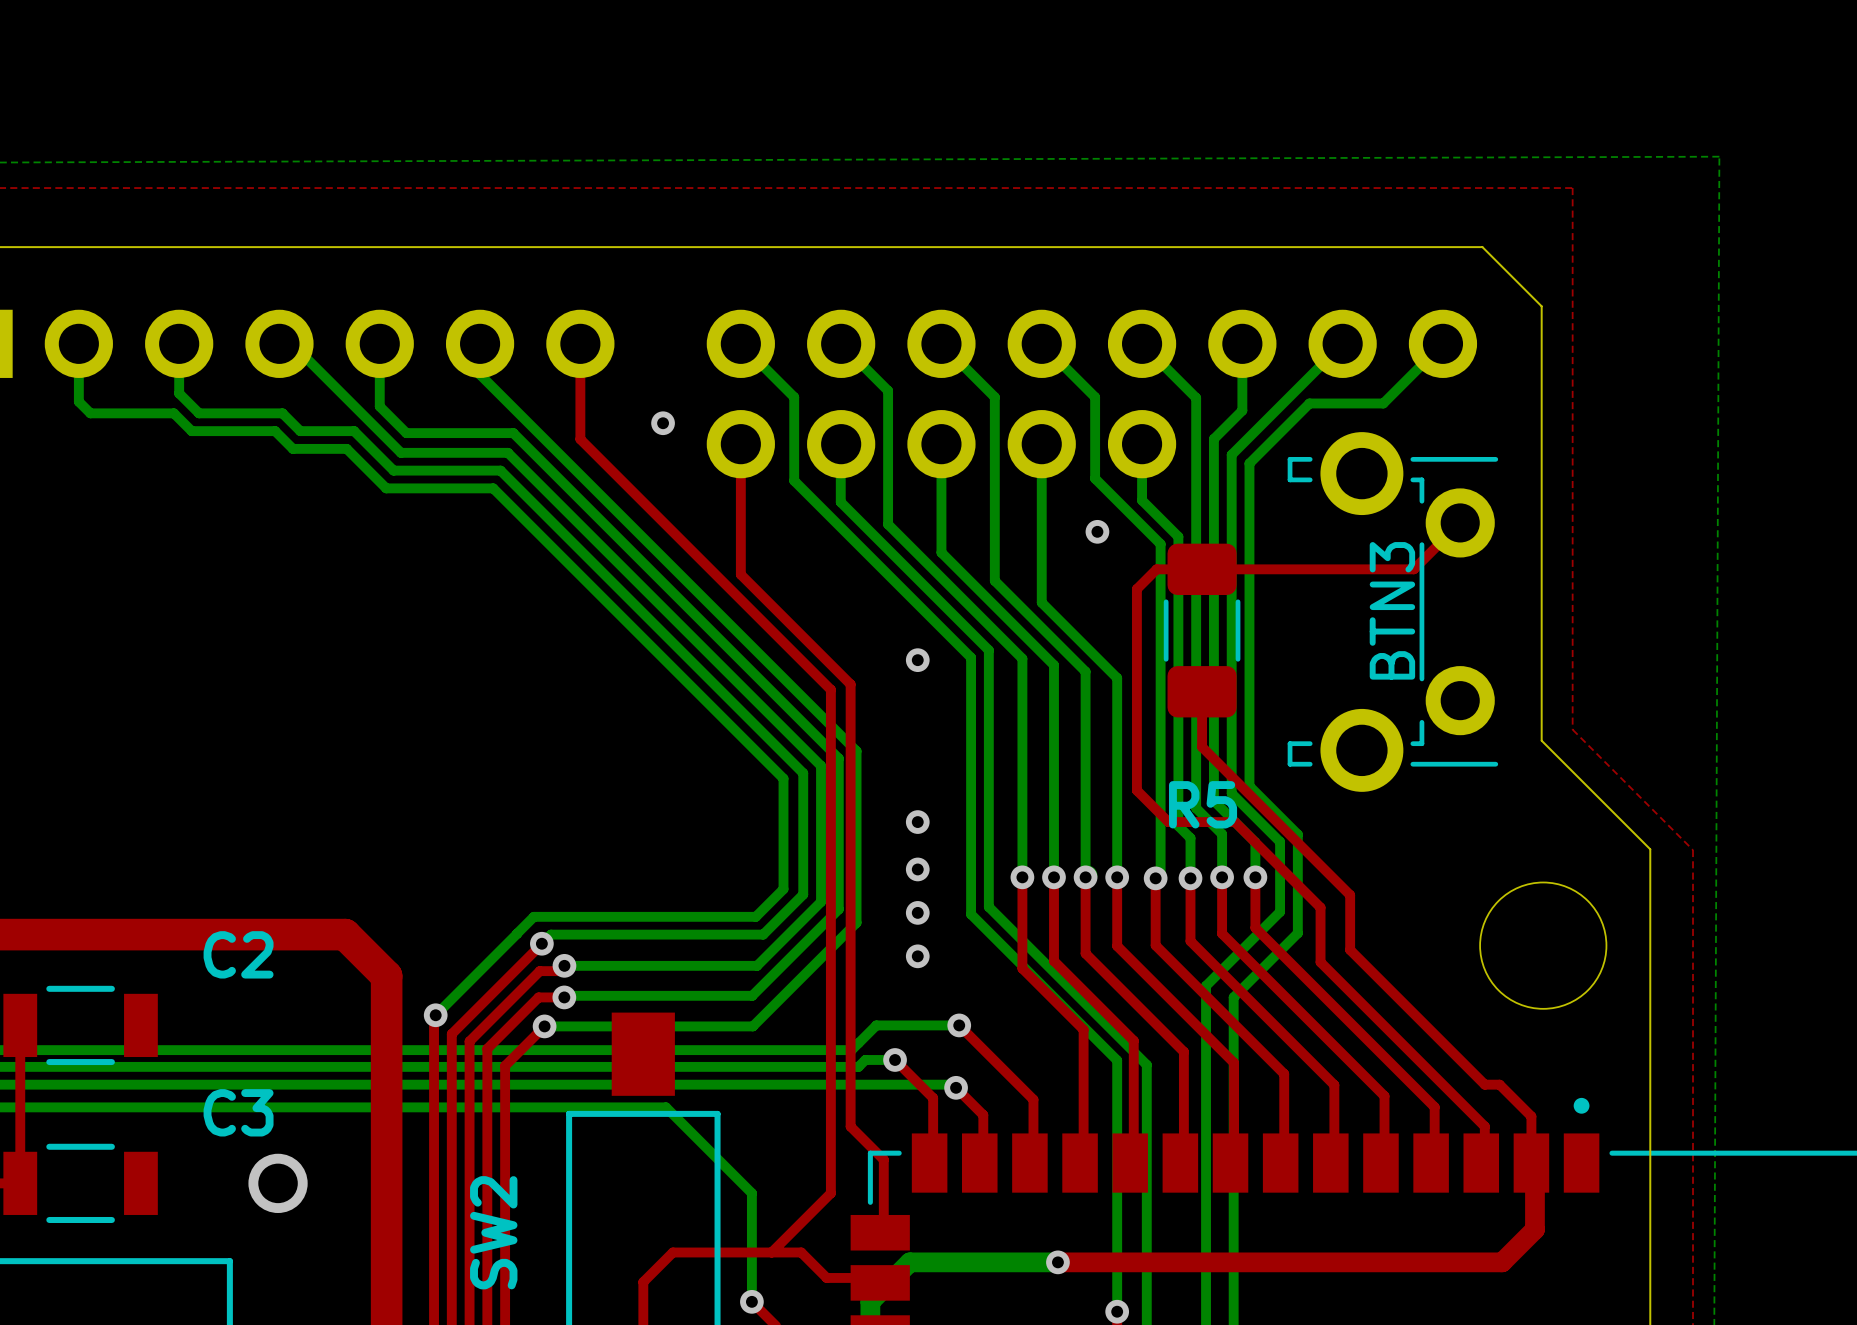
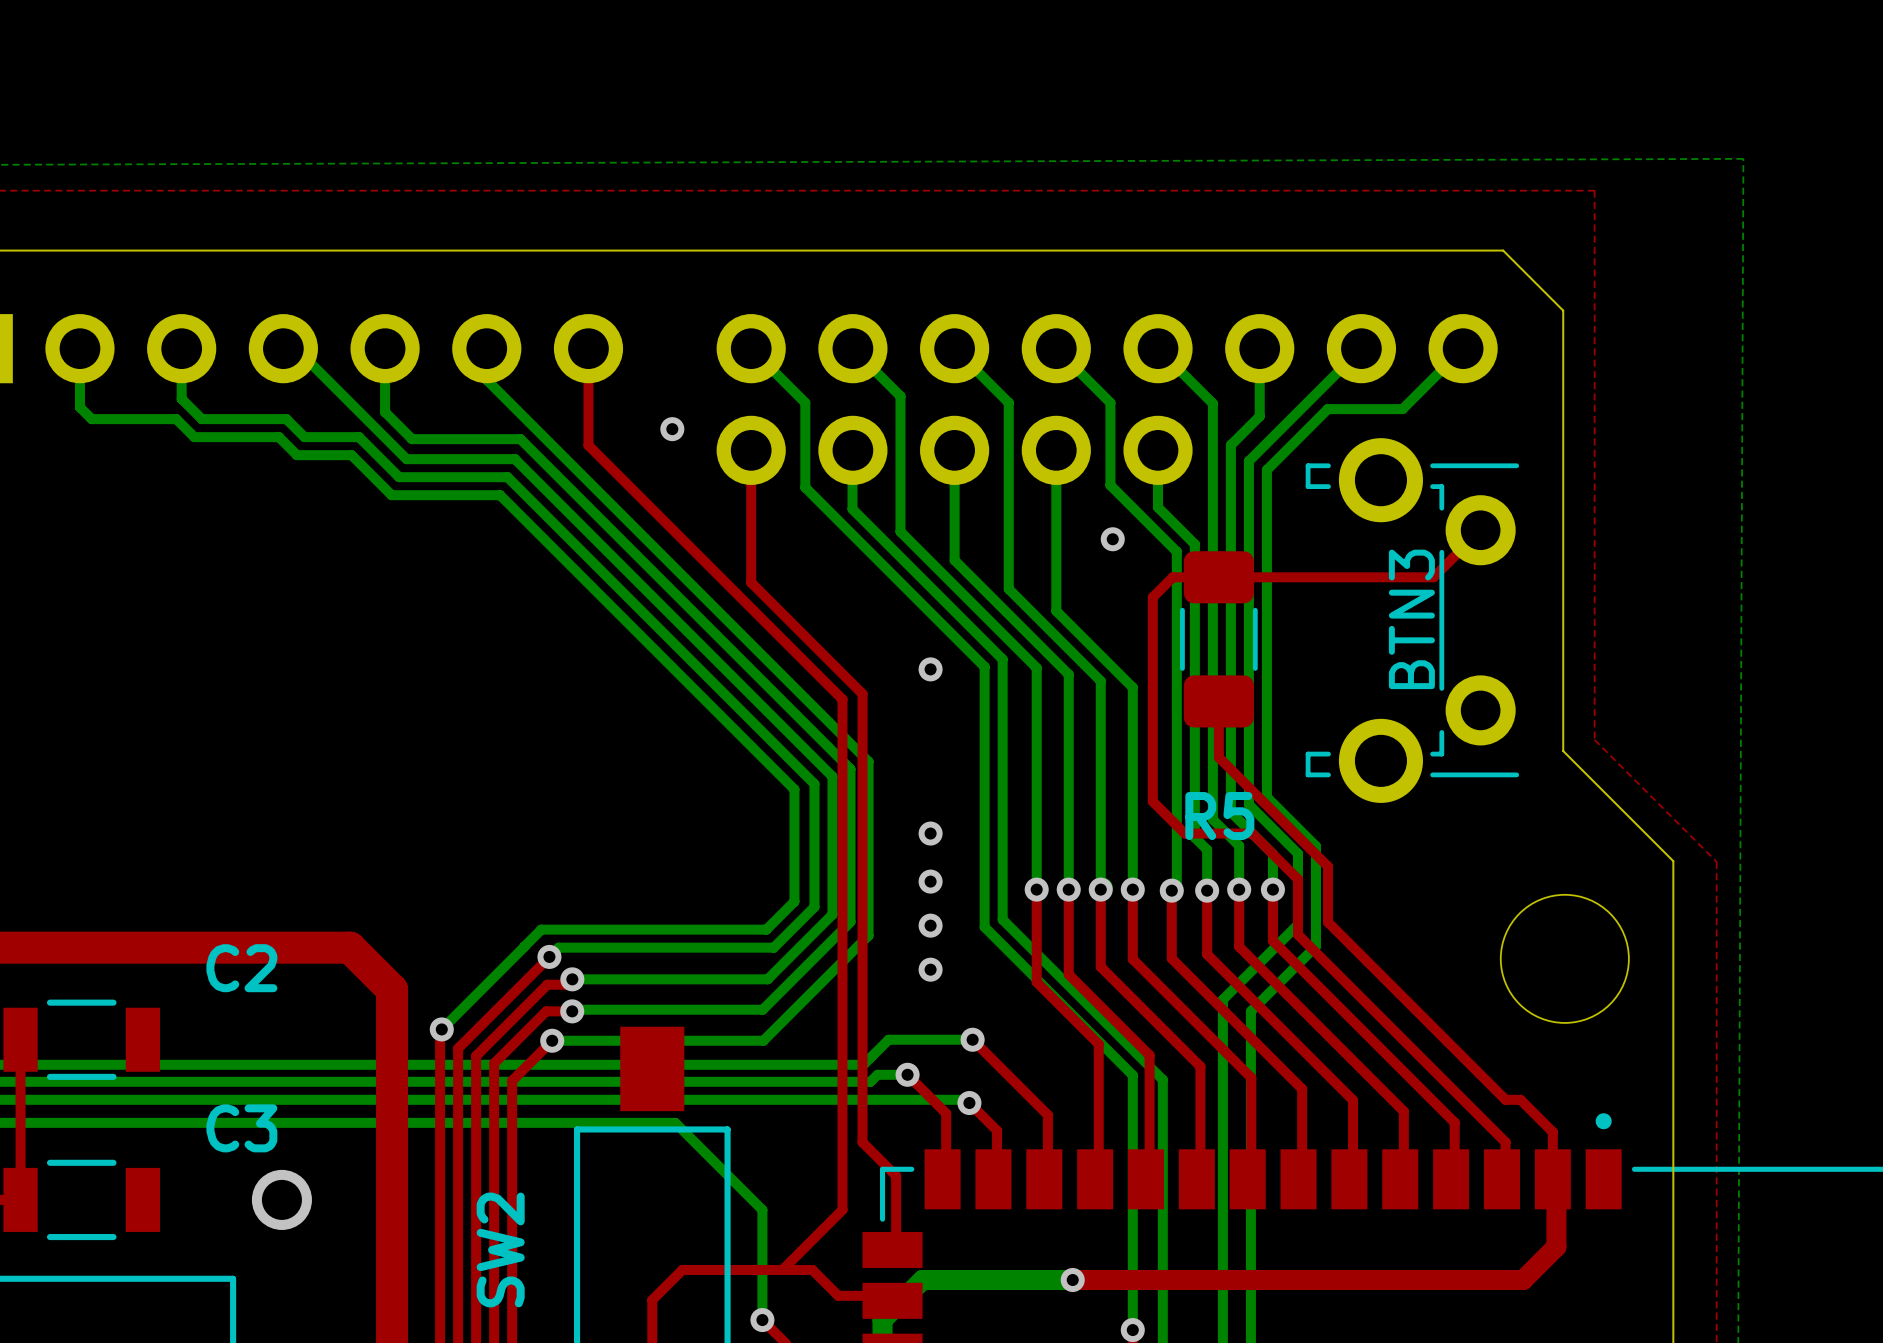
top track: (1309, 854) (1350, 895) (1350, 949) -> (1327, 866) (1327, 922) (1369, 963)
top track: (1280, 867) (1320, 907) (1320, 962) -> (1297, 879) (1297, 934) (1339, 975)

